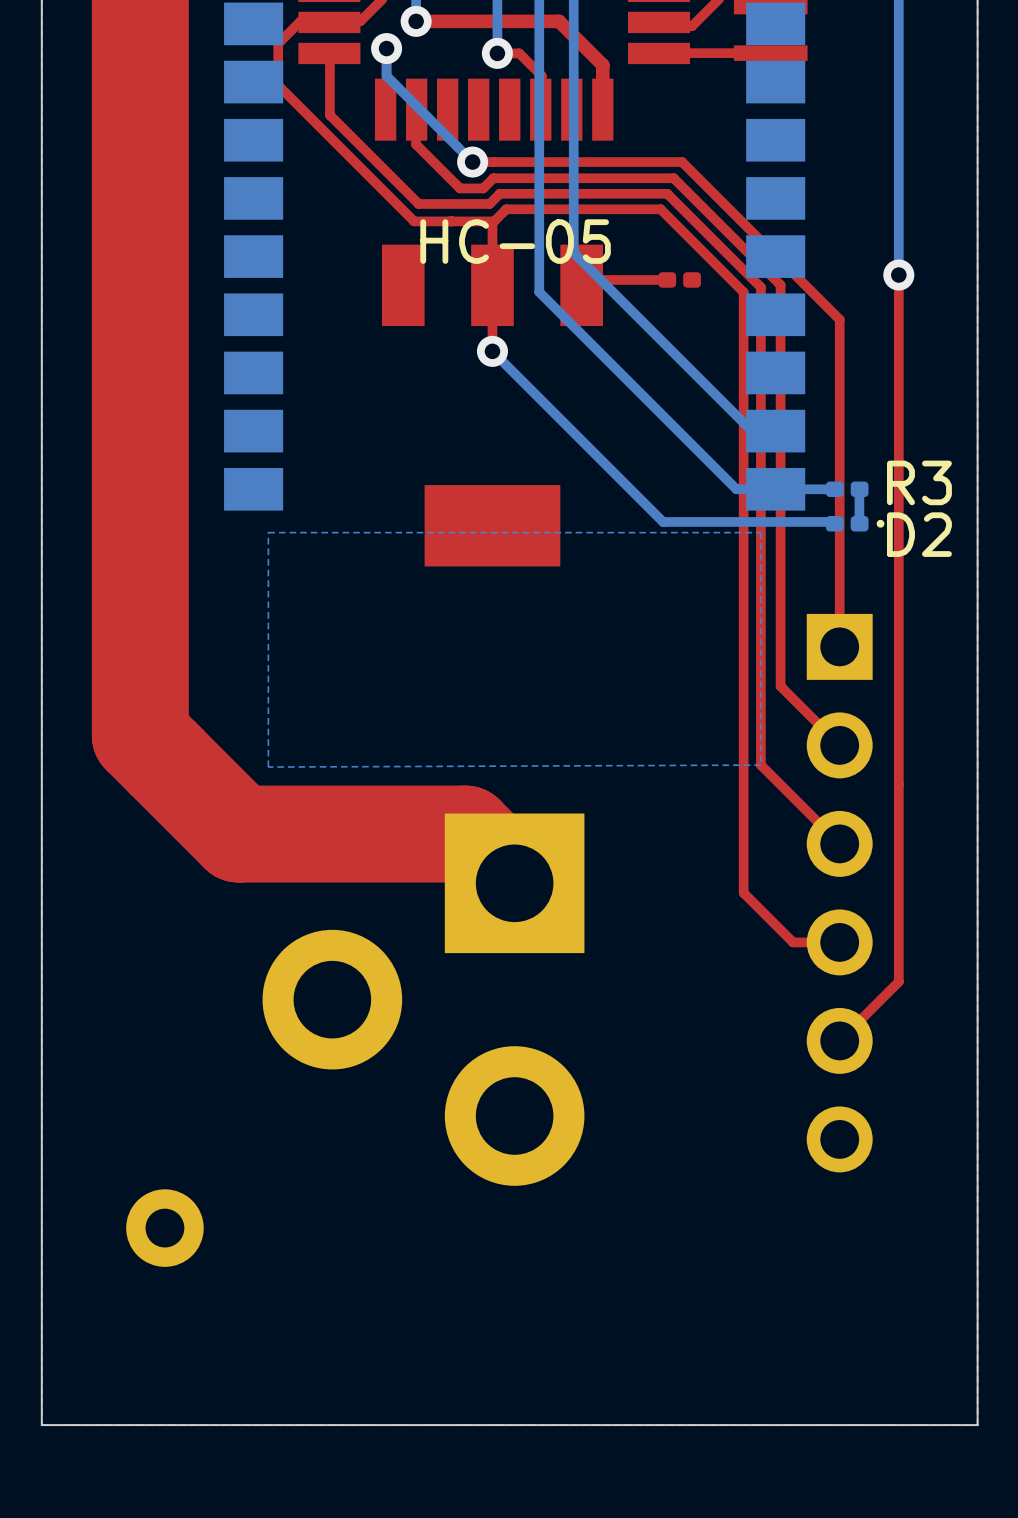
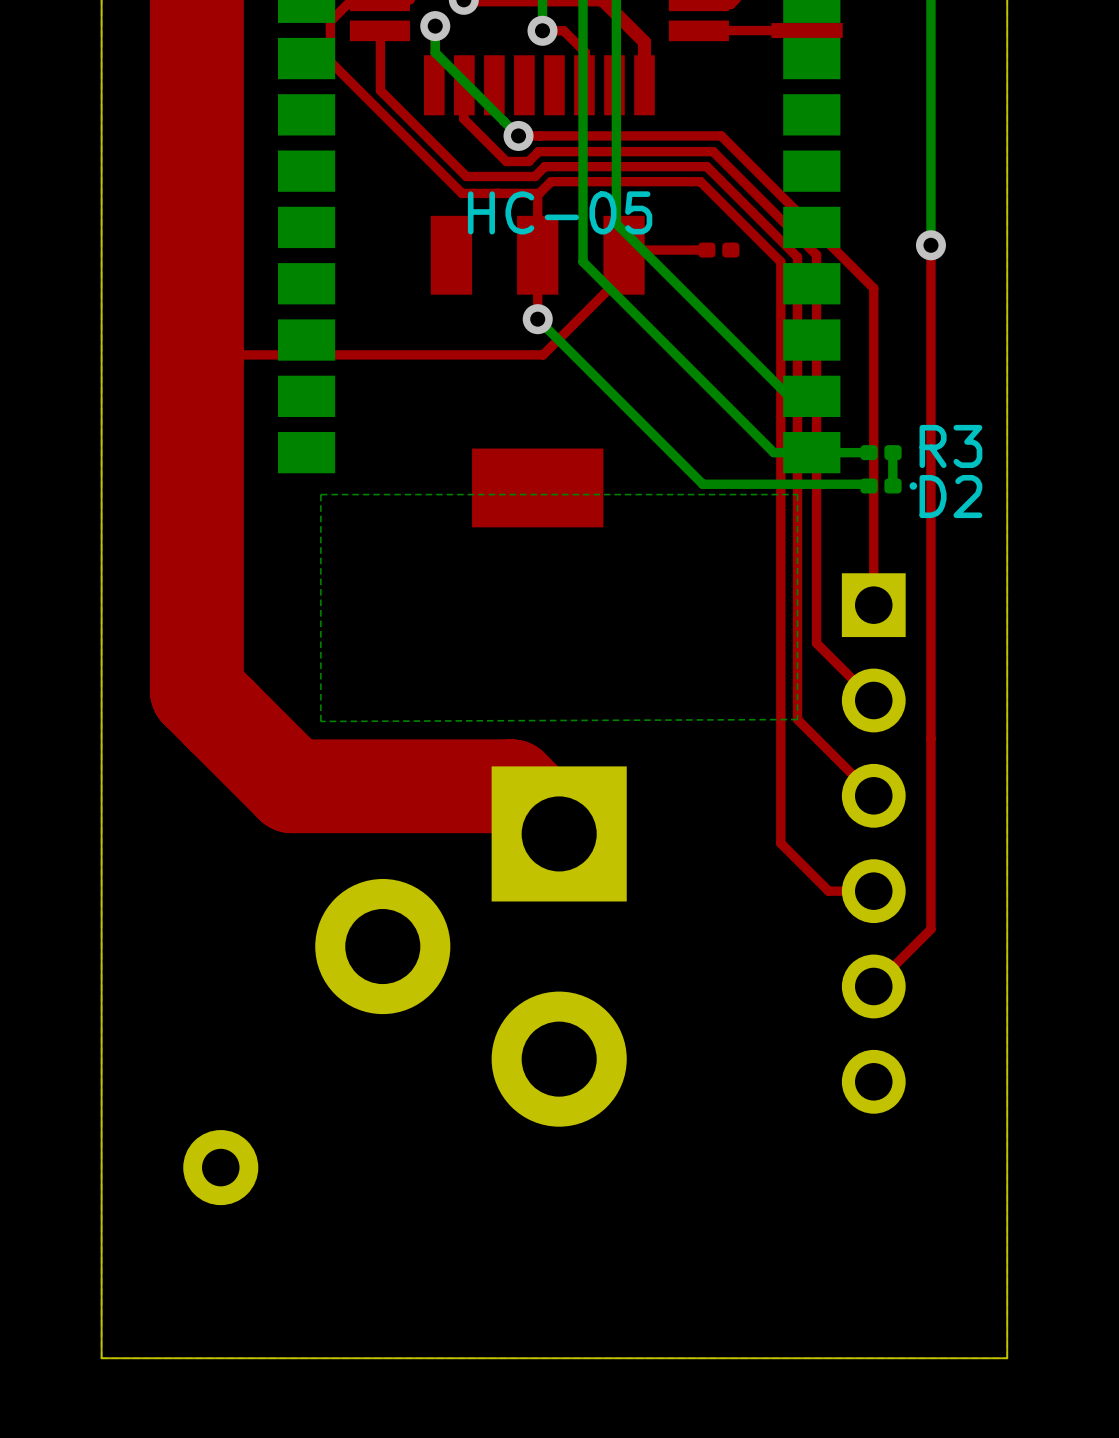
top track: none -> (624, 274) (543, 354) (196, 354)

